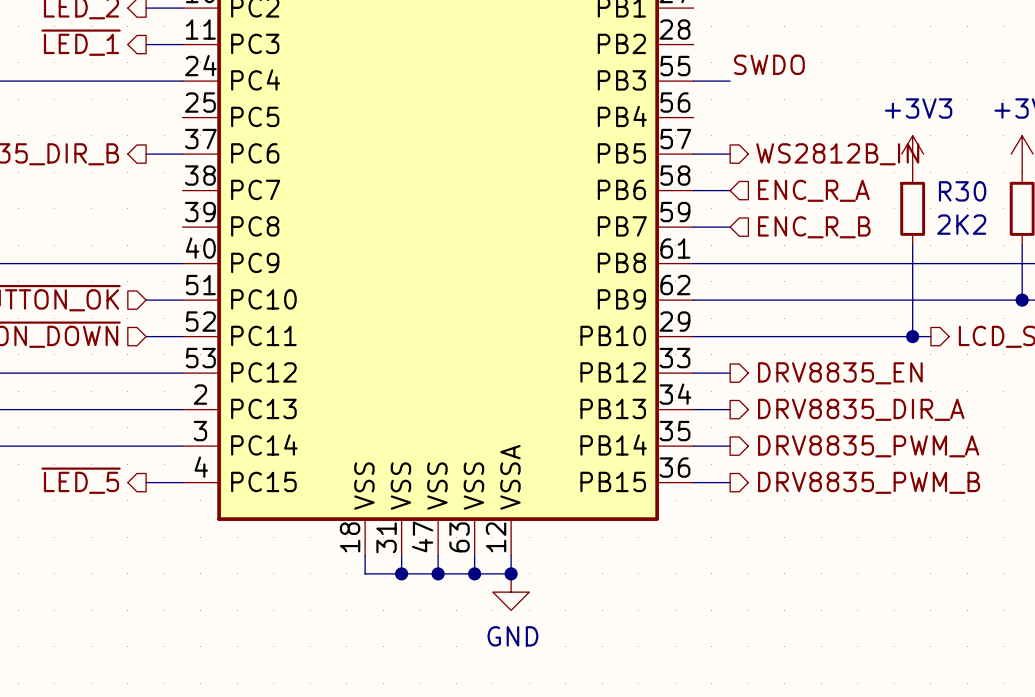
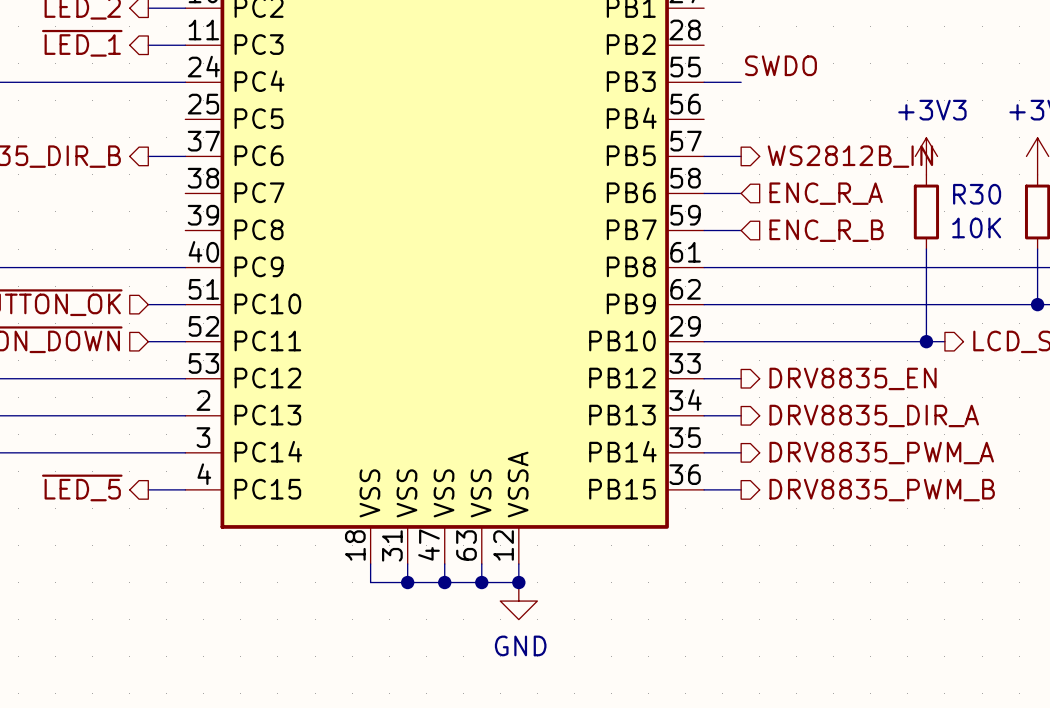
R30 value: 2K2 (961, 224) -> 10K (976, 227)

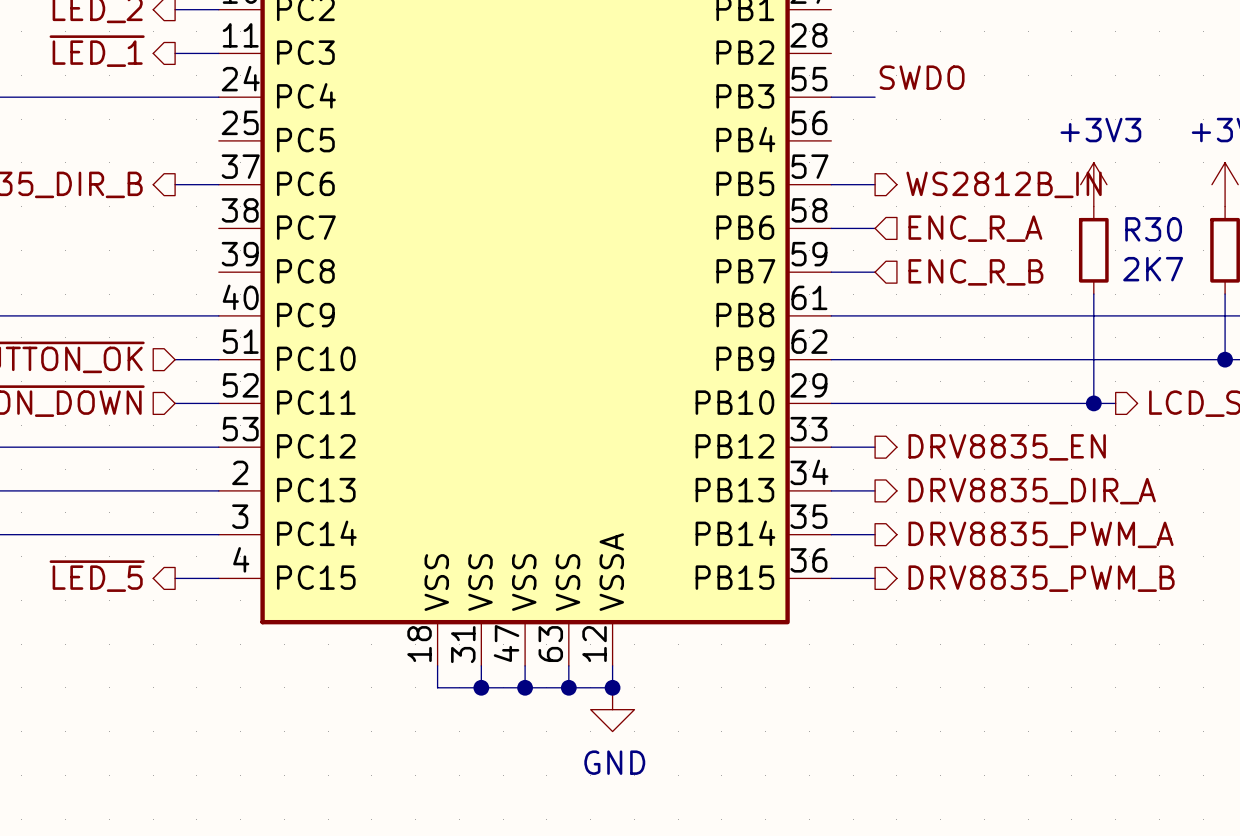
R30 value: 10K (976, 227) -> 2K7 (1153, 269)

